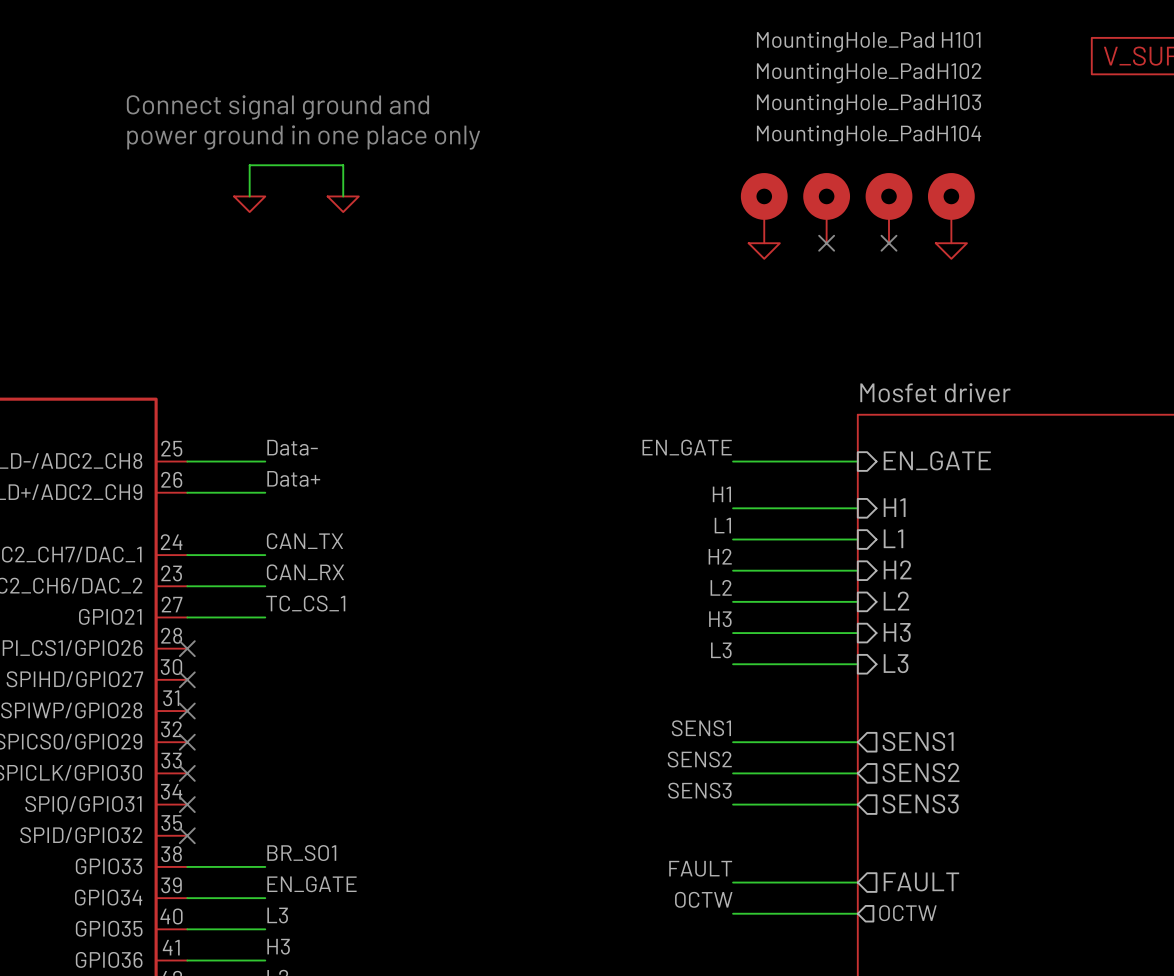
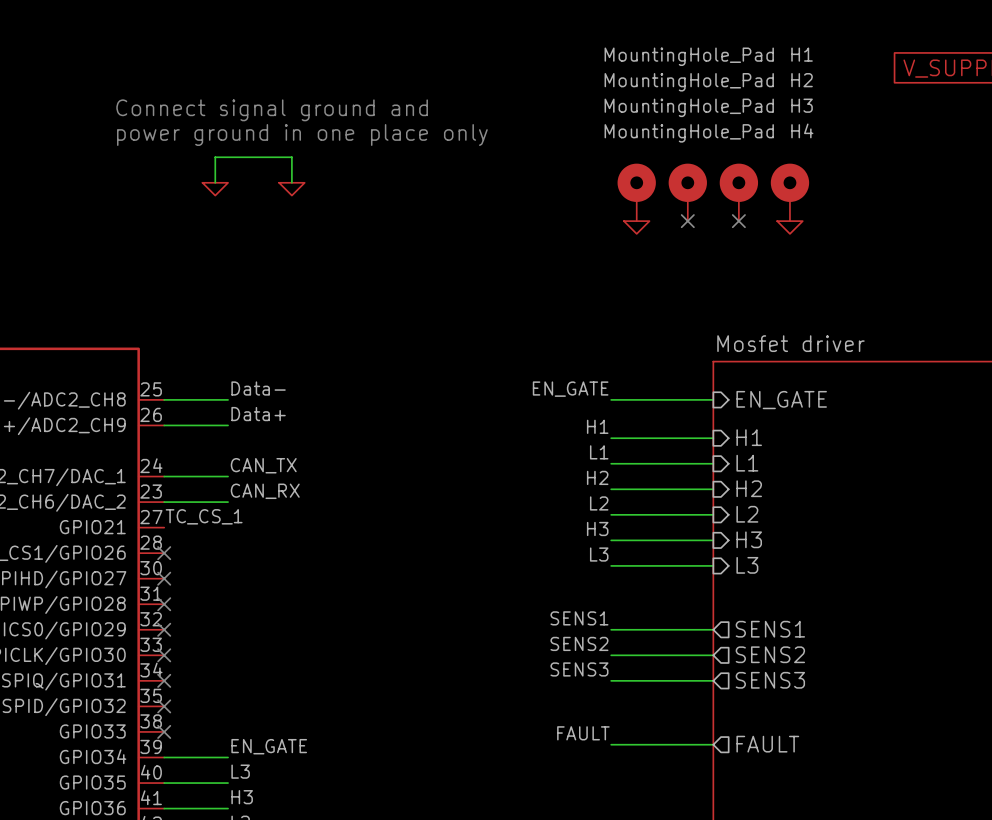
H101 name: H101 (961, 39) -> H1 (802, 54)
H102 name: H102 (959, 71) -> H2 (802, 80)
H103 name: H103 (959, 102) -> H3 (802, 105)
H104 name: H104 (959, 133) -> H4 (802, 130)
label position: TC_CS_1 (305, 603) -> TC_CS_1 (204, 516)
wire: (187, 617) (265, 617) -> none
label: BR_SO1 (301, 853) -> none
wire: (187, 866) (265, 866) -> none
no-connect mark: none -> (164, 731)
label: OCTW (703, 899) -> none
wire: (733, 913) (857, 913) -> none
sheet pin: OCTW (907, 913) -> none

